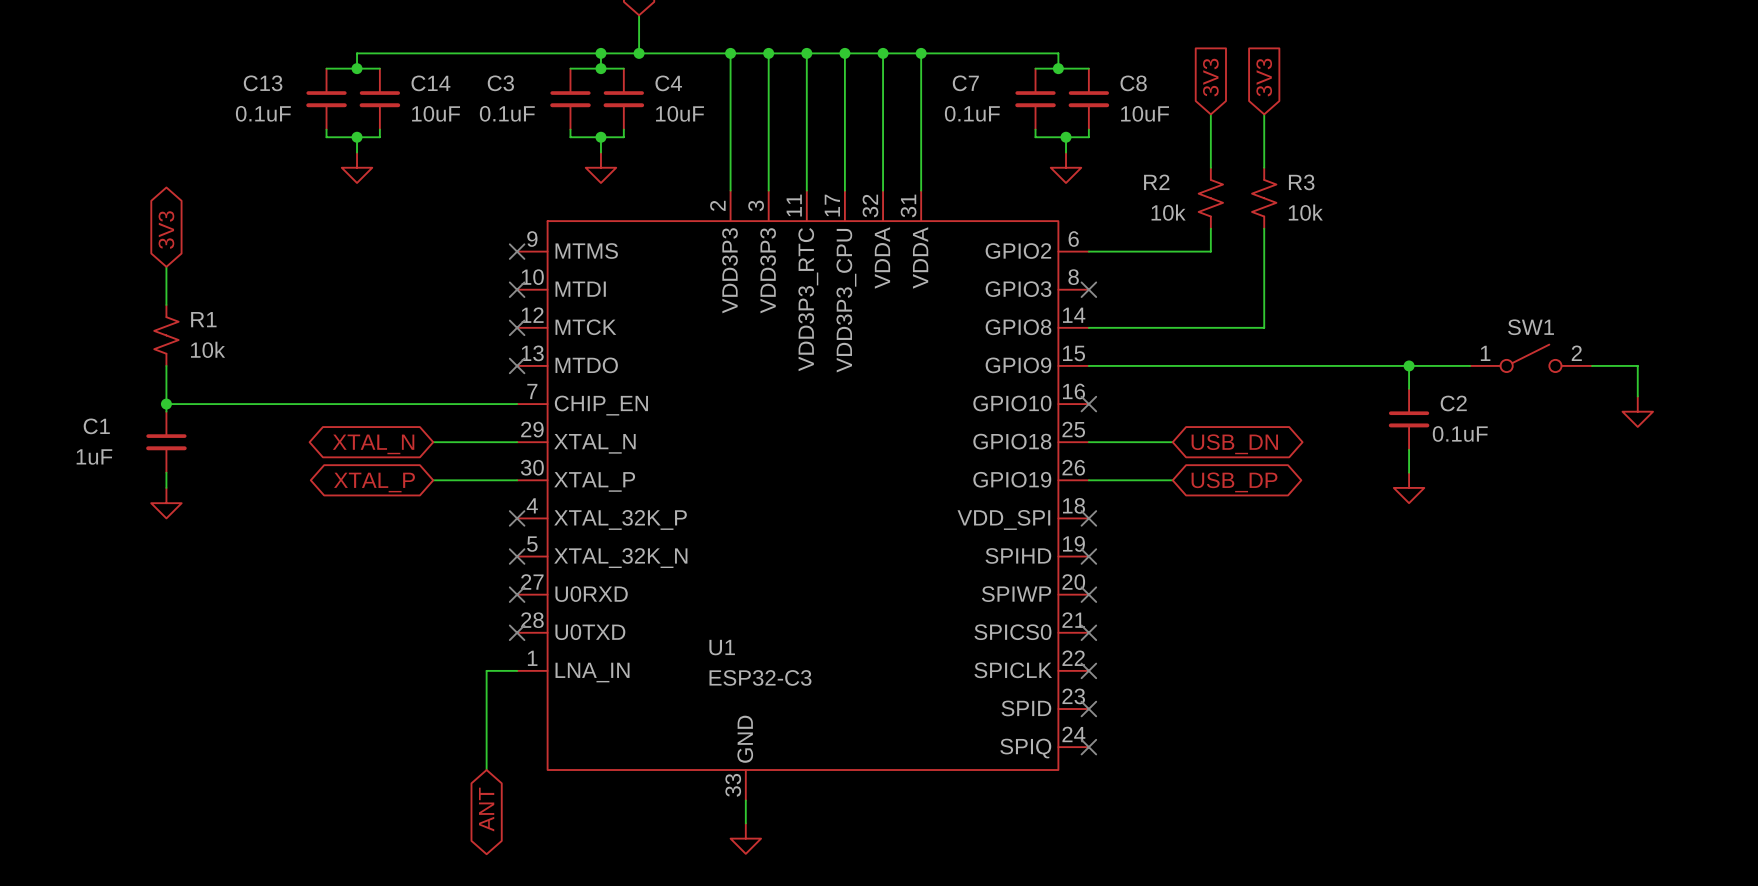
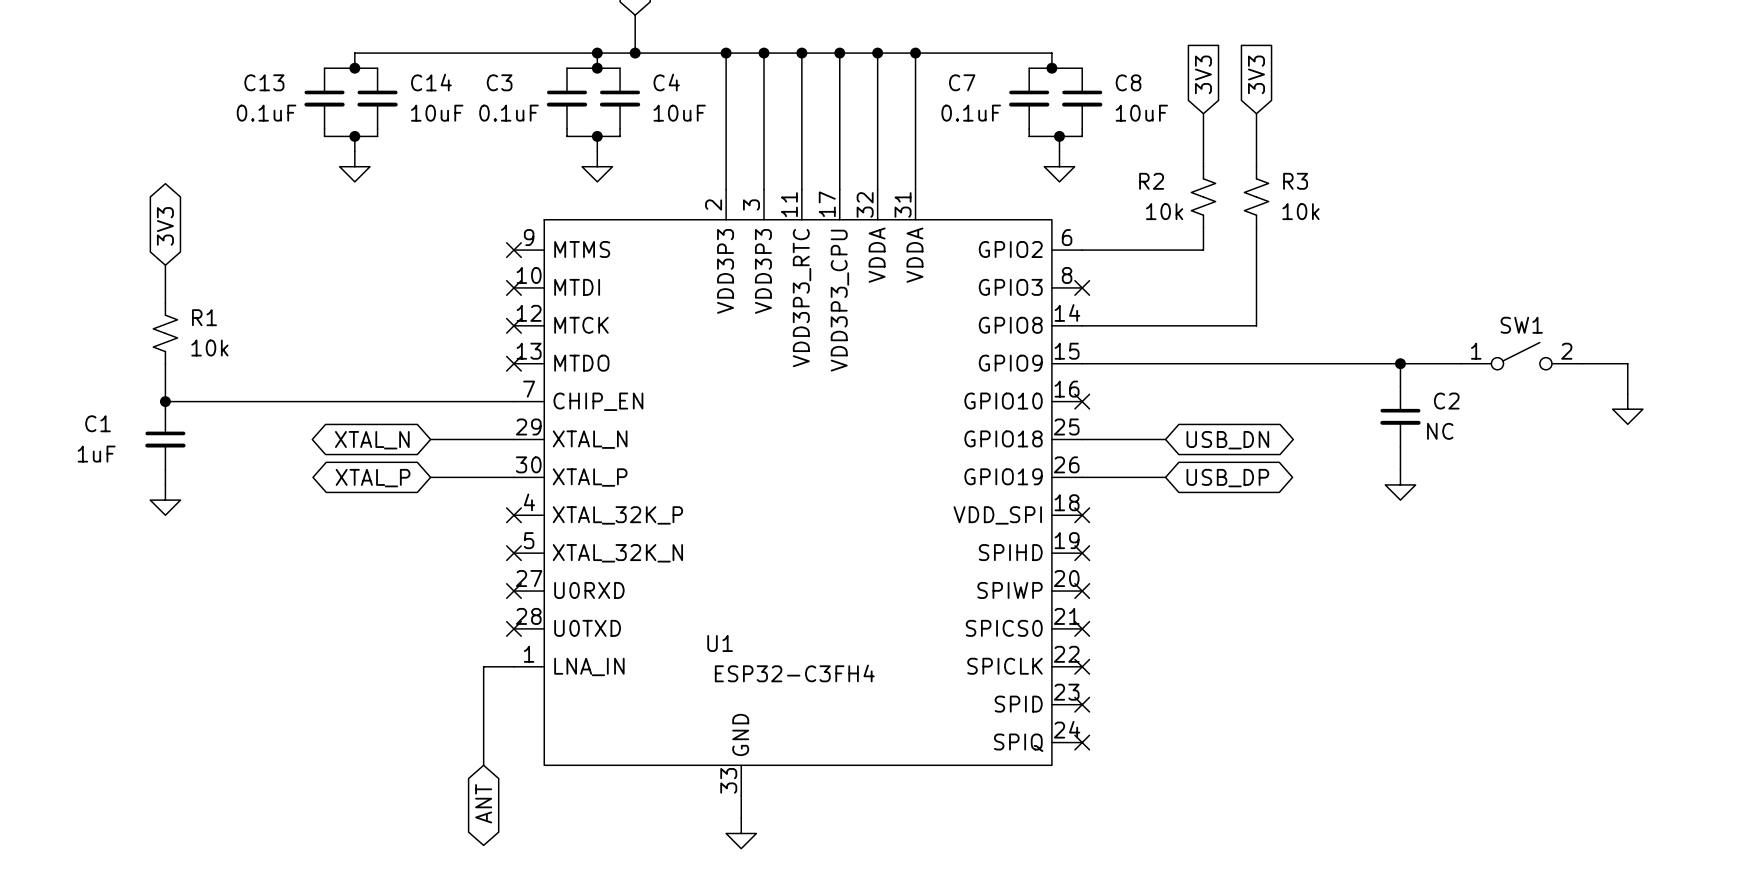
C2 value: 0.1uF (1460, 433) -> NC (1440, 431)
U1 value: ESP32-C3 (760, 677) -> ESP32-C3FH4 (794, 673)

